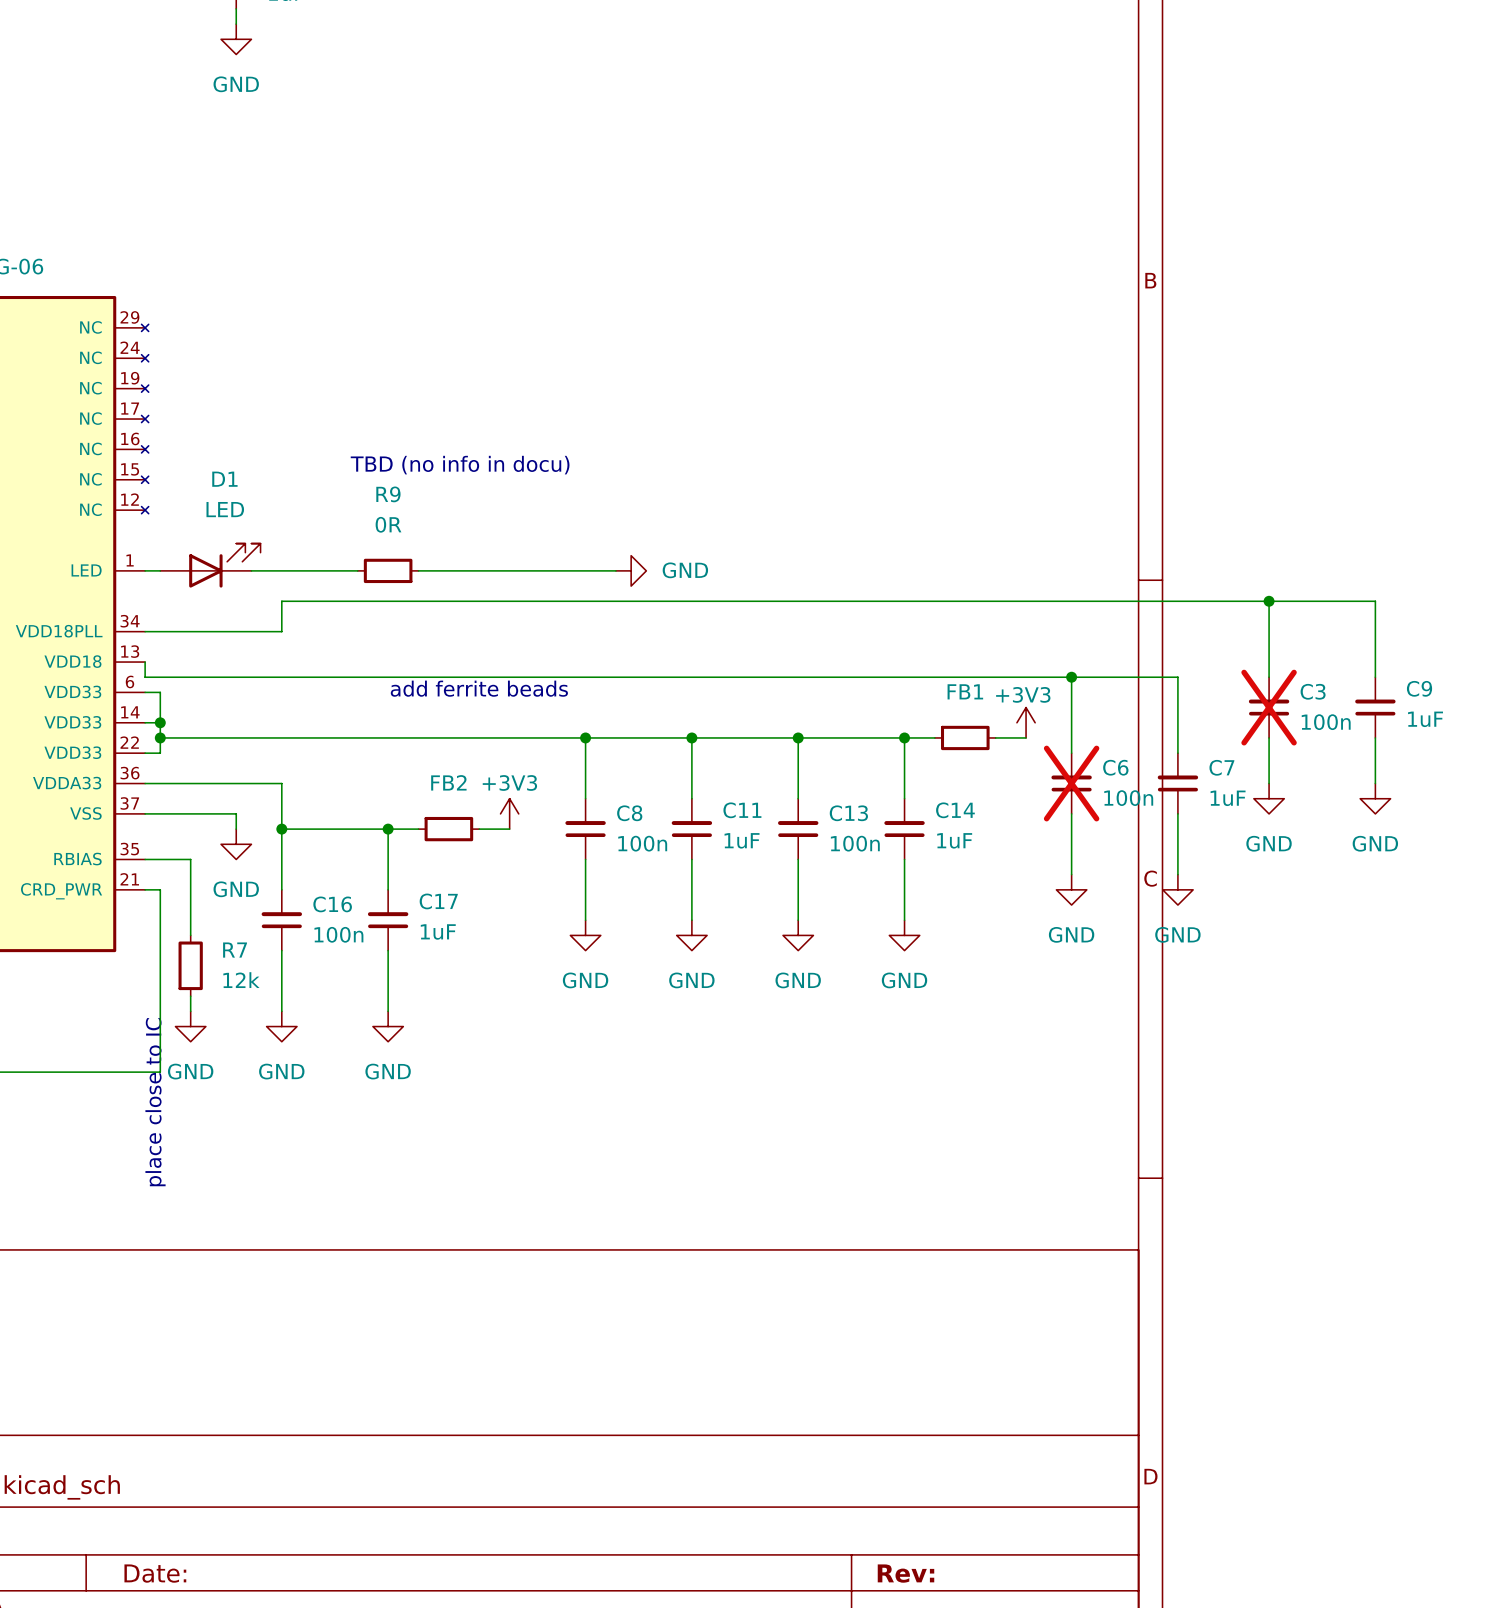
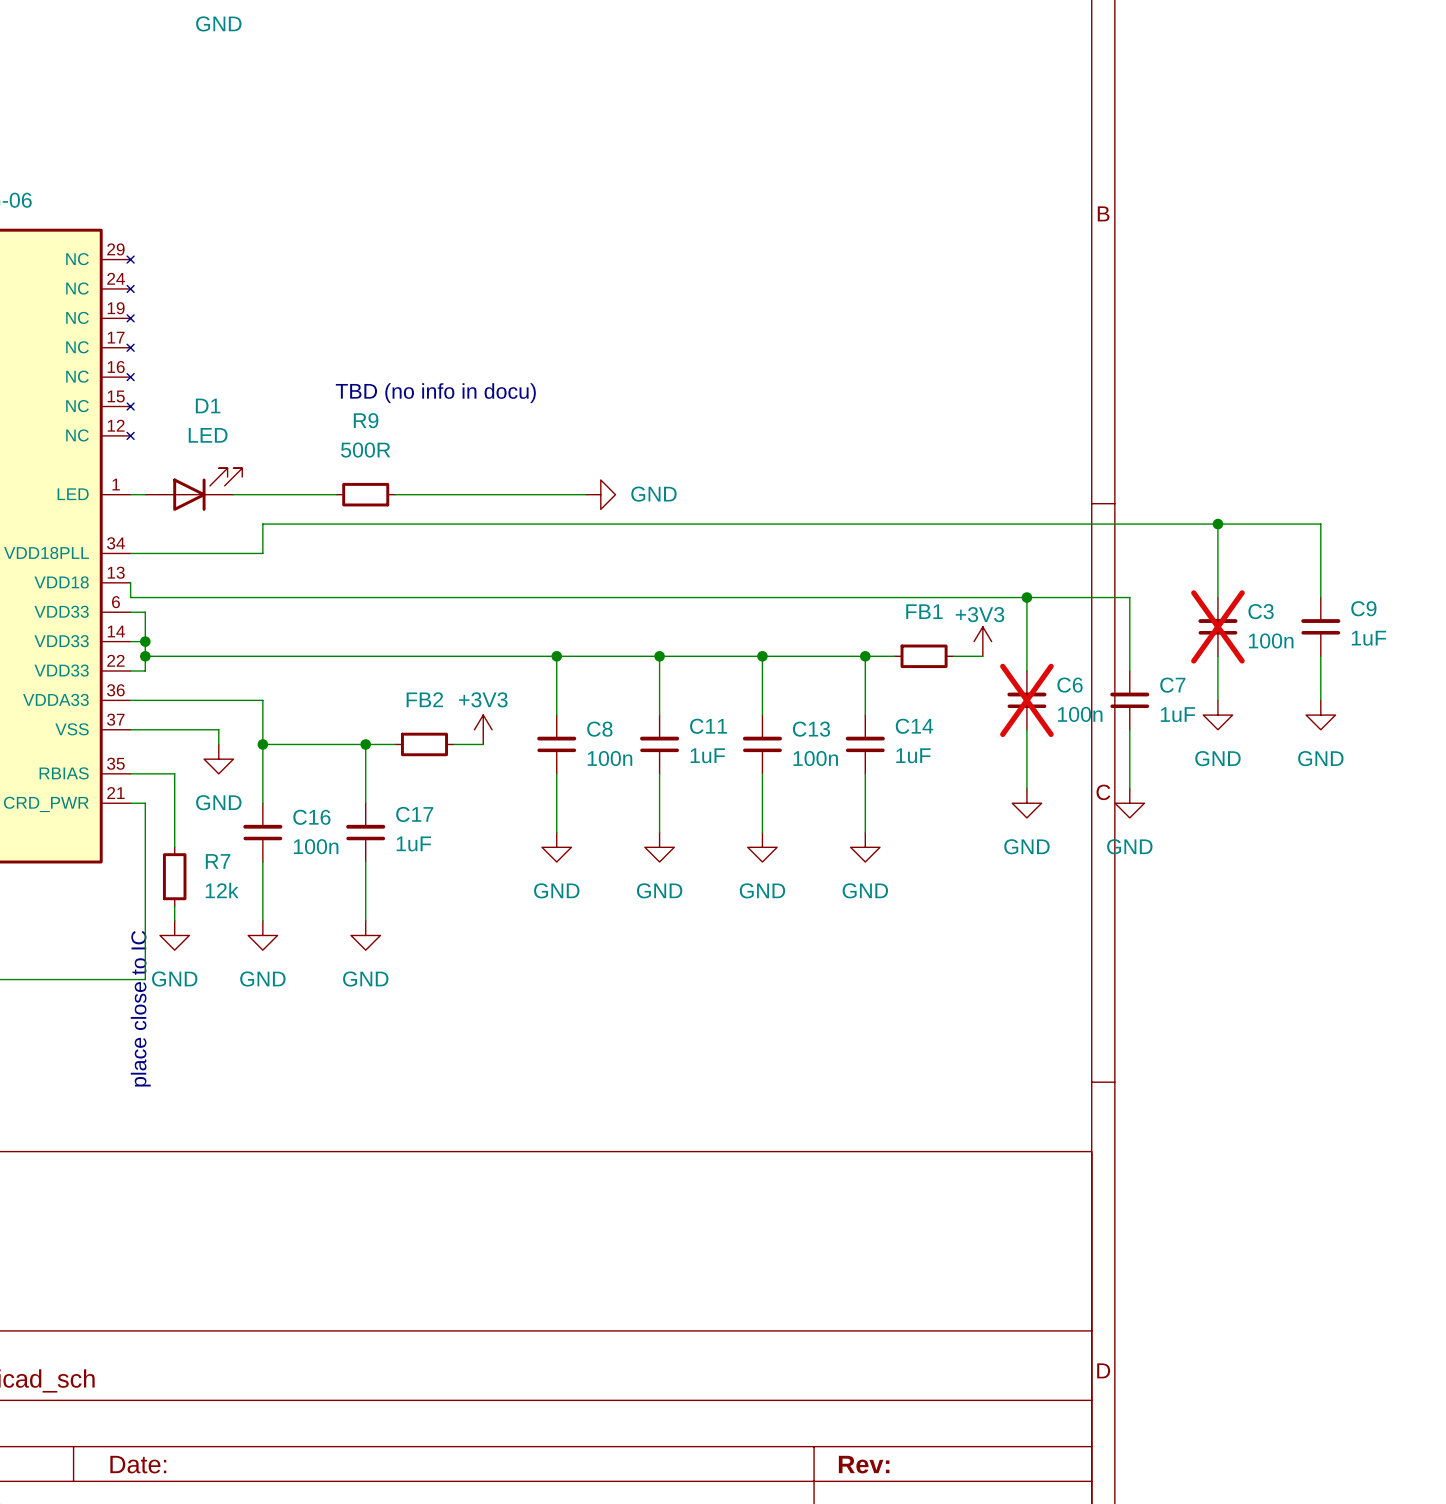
R9 text: 0R (388, 524) -> 500R (365, 450)
text: add ferrite beads (479, 688) -> none

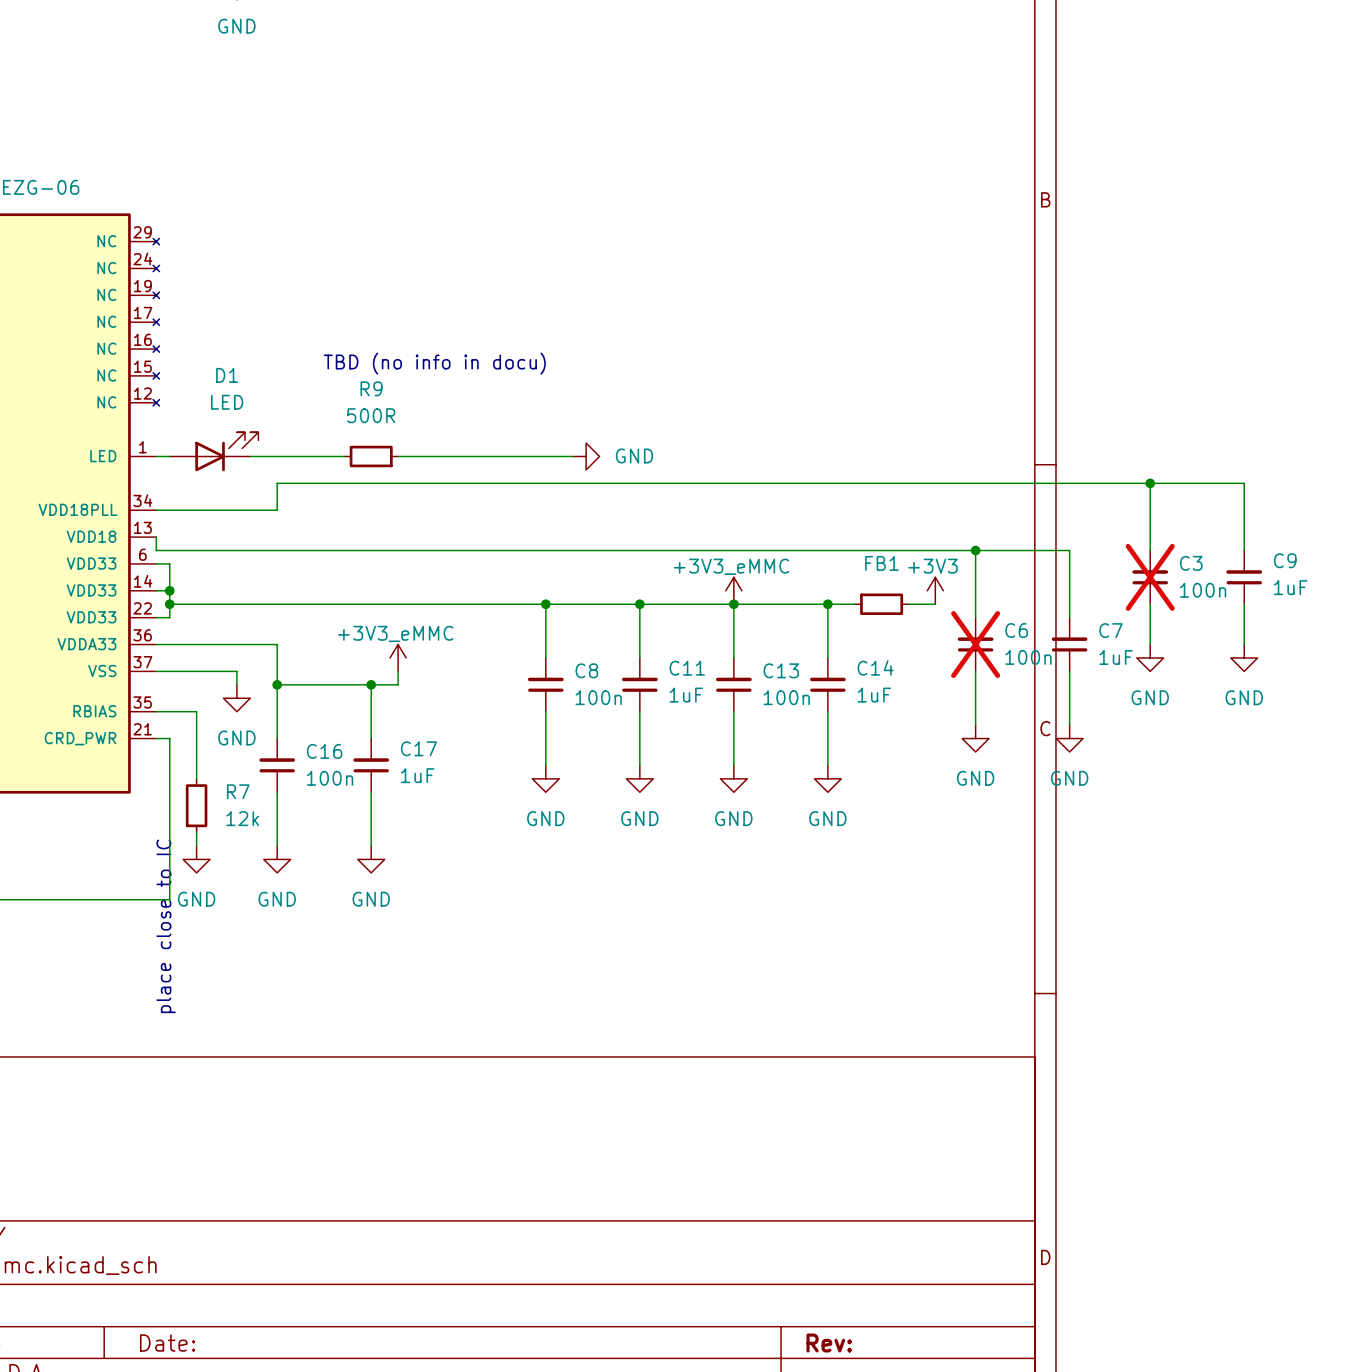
power symbol: none -> +3V3_eMMC (733, 590)
power symbol: none -> +3V3_eMMC (398, 657)
wire: none -> (398, 671) (398, 684)
power symbol: +3V3 (483, 729) -> none
FB2: (424, 744) -> none
wire: (453, 744) (483, 744) -> none

